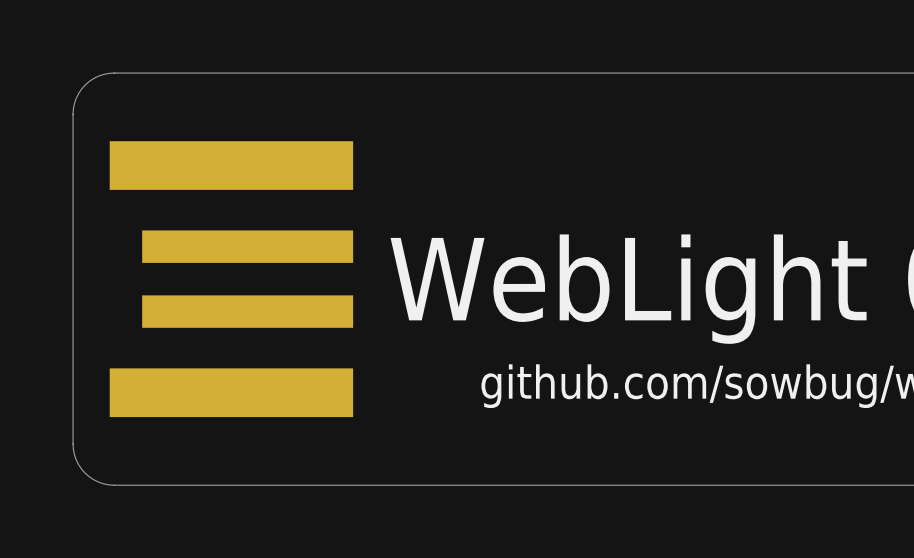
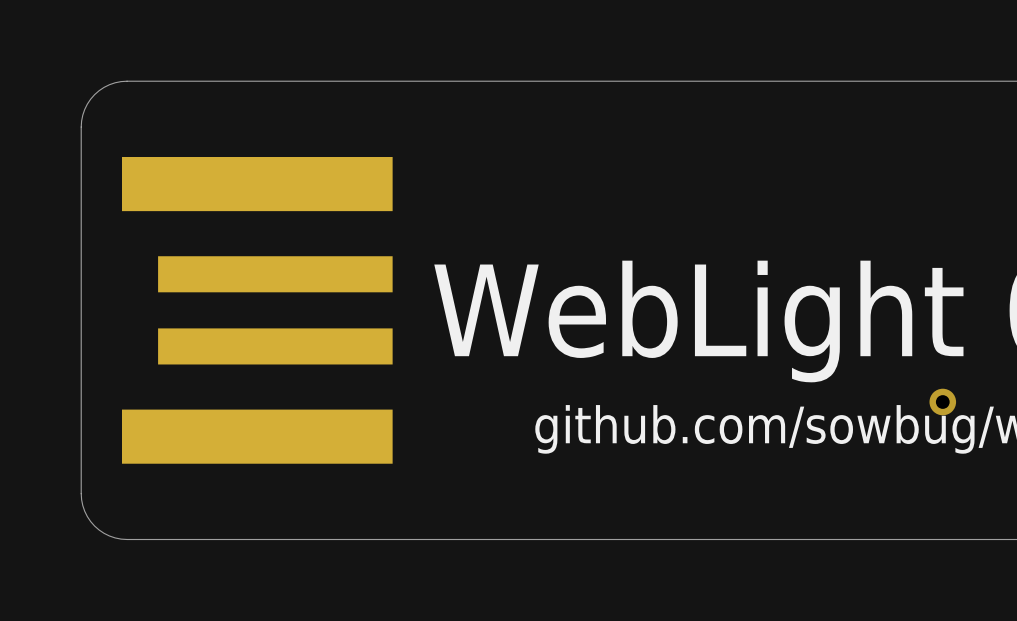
via: none -> (942, 402)

